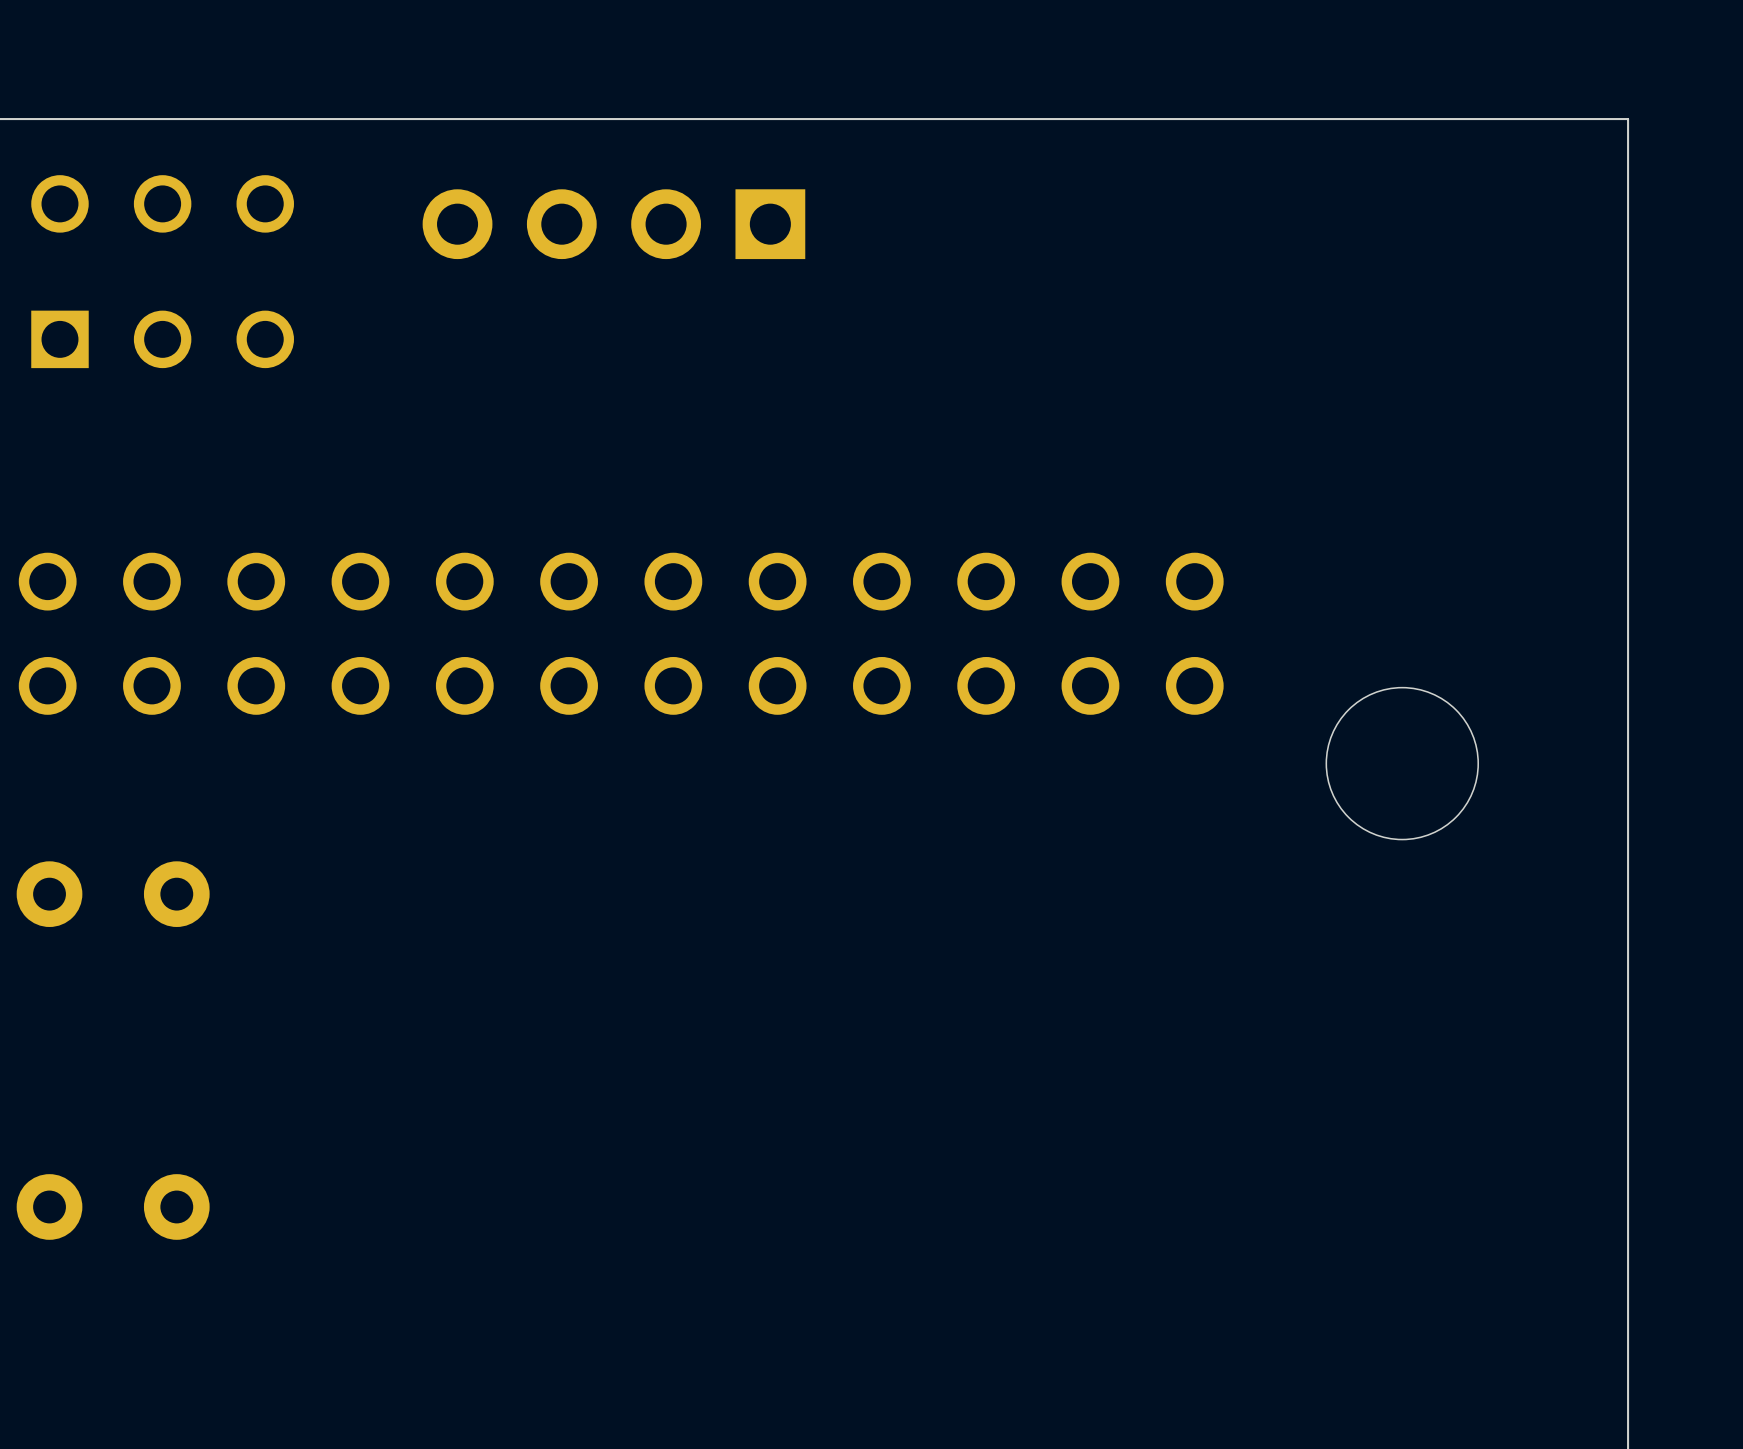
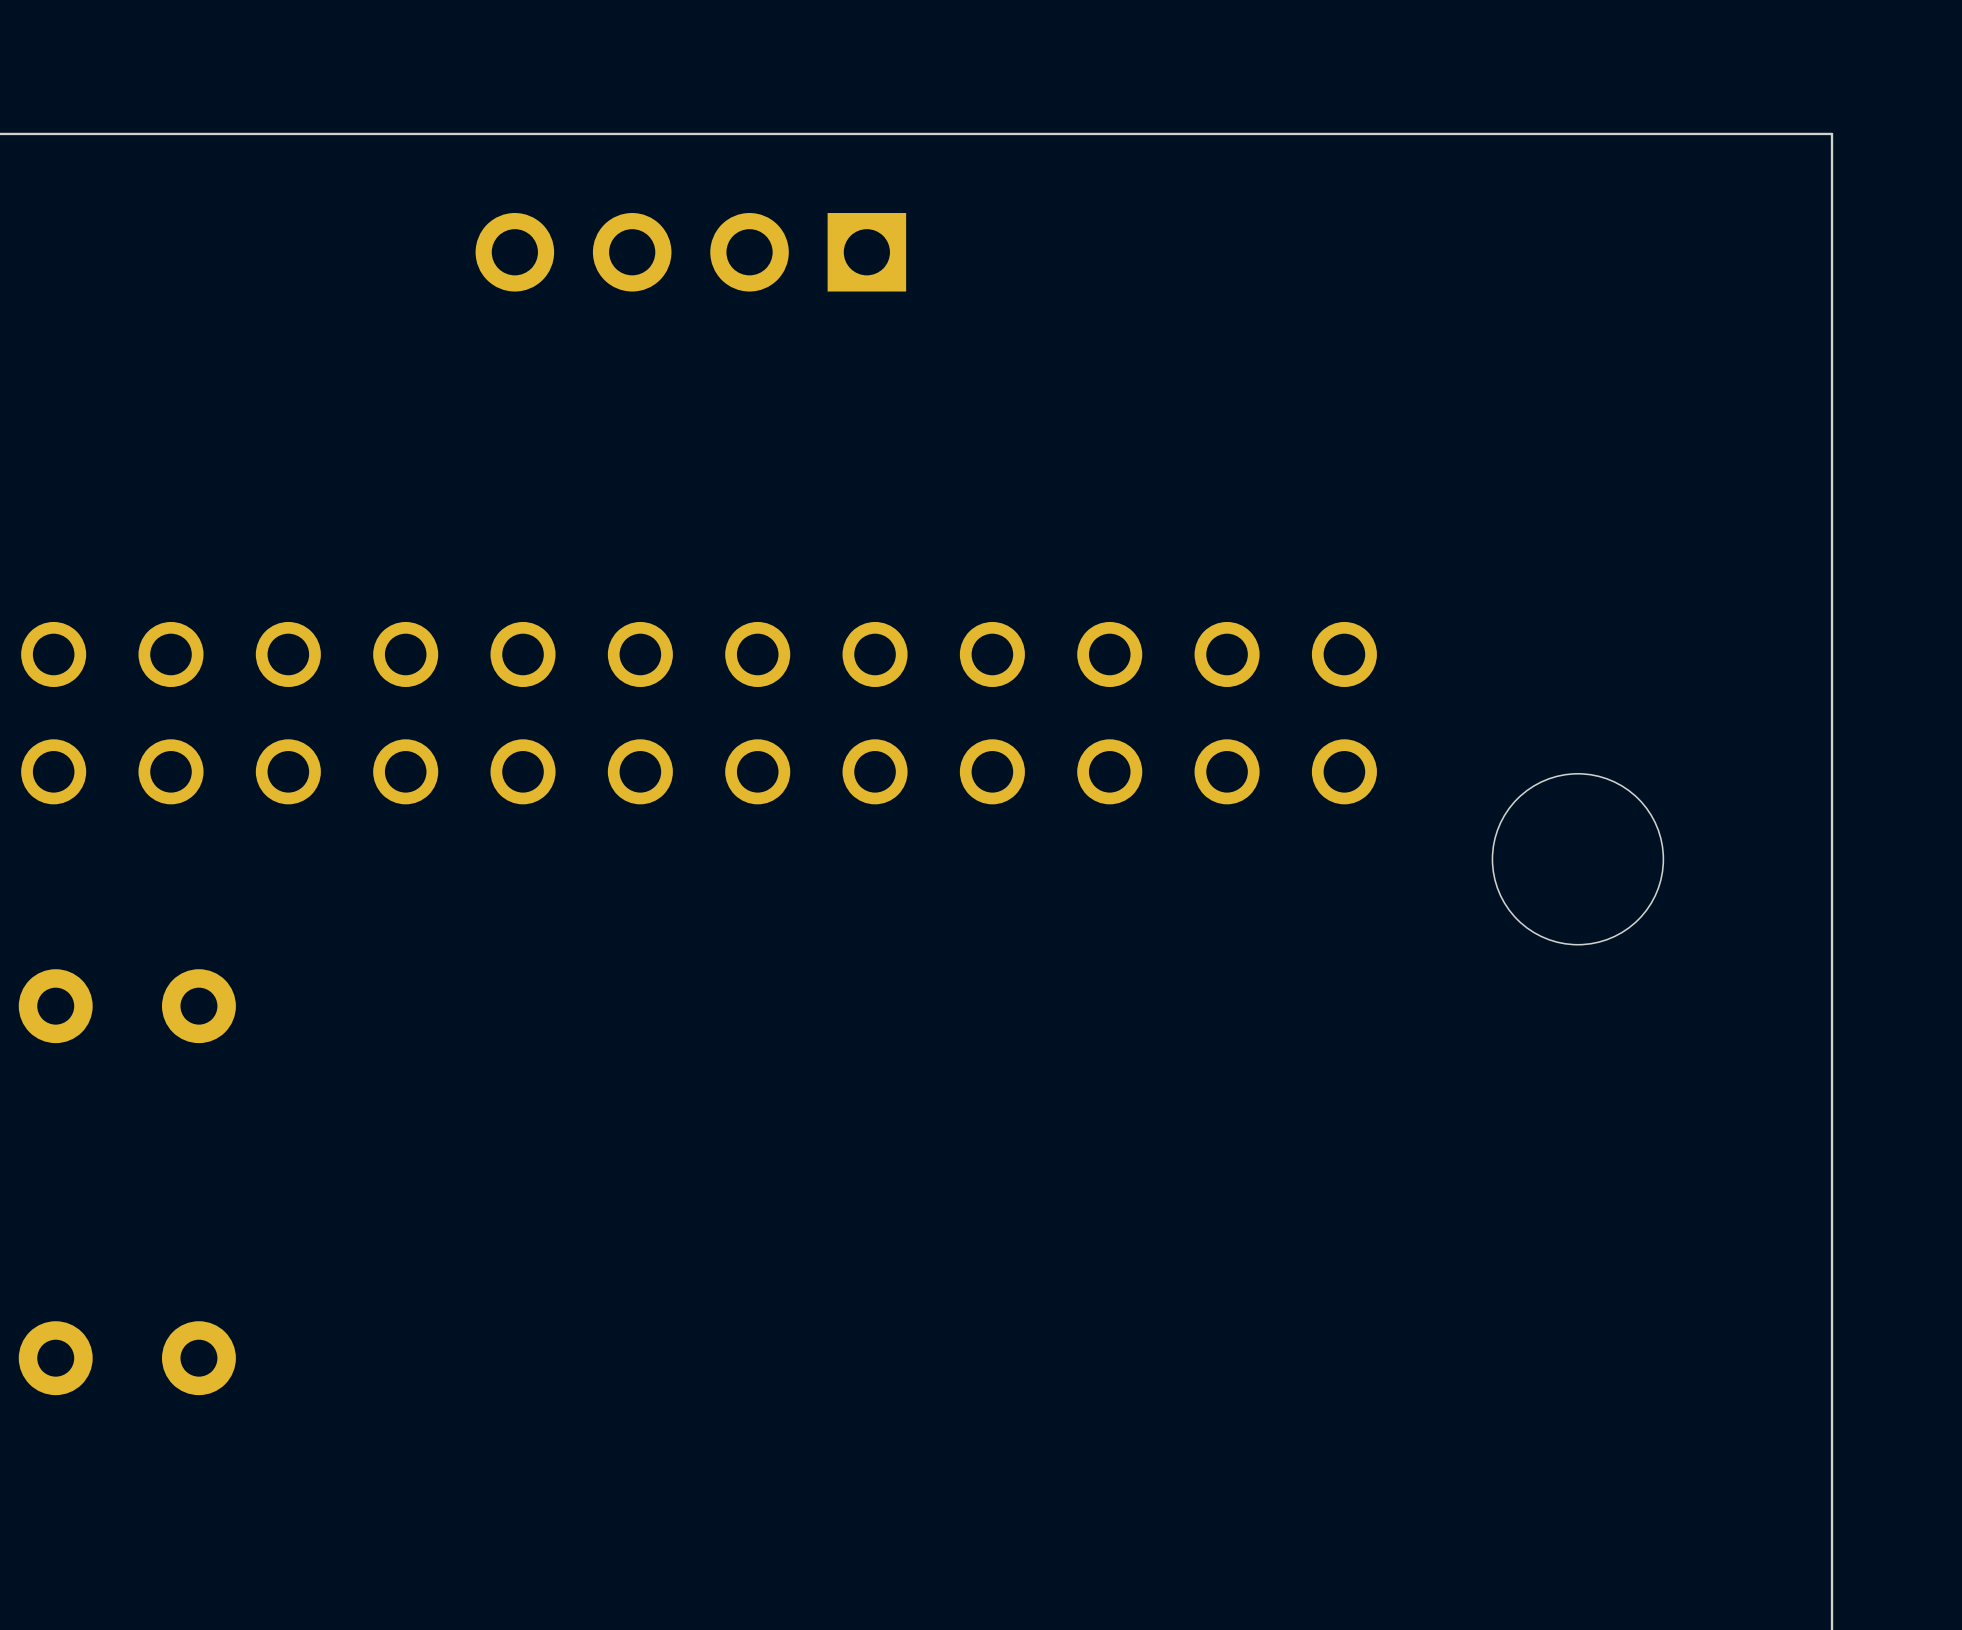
part: (162, 271) -> none

